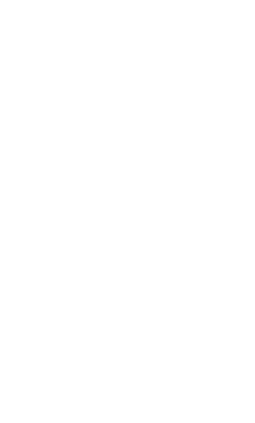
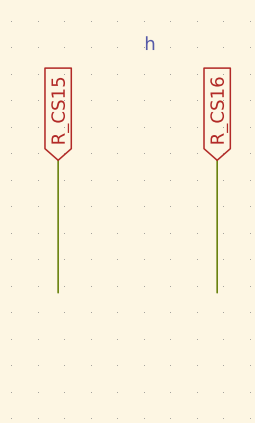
text: none -> h (150, 43)
global label: none -> R_CS15 (60, 110)
global label: none -> R_CS16 (219, 110)
wire: none -> (58, 160) (58, 292)
wire: none -> (217, 160) (217, 292)

